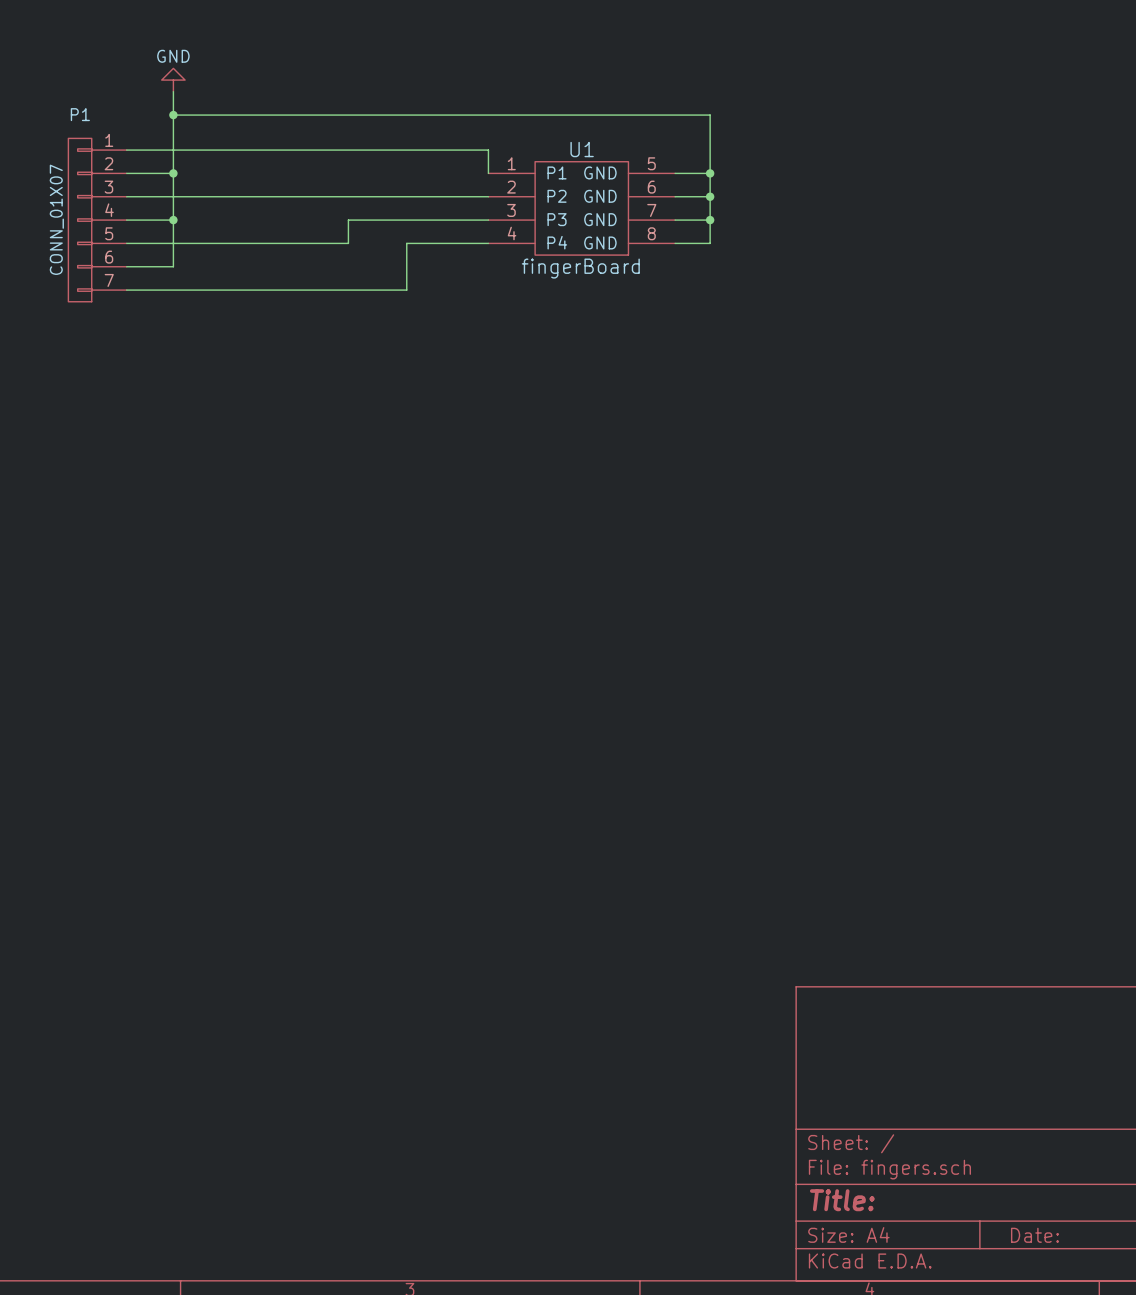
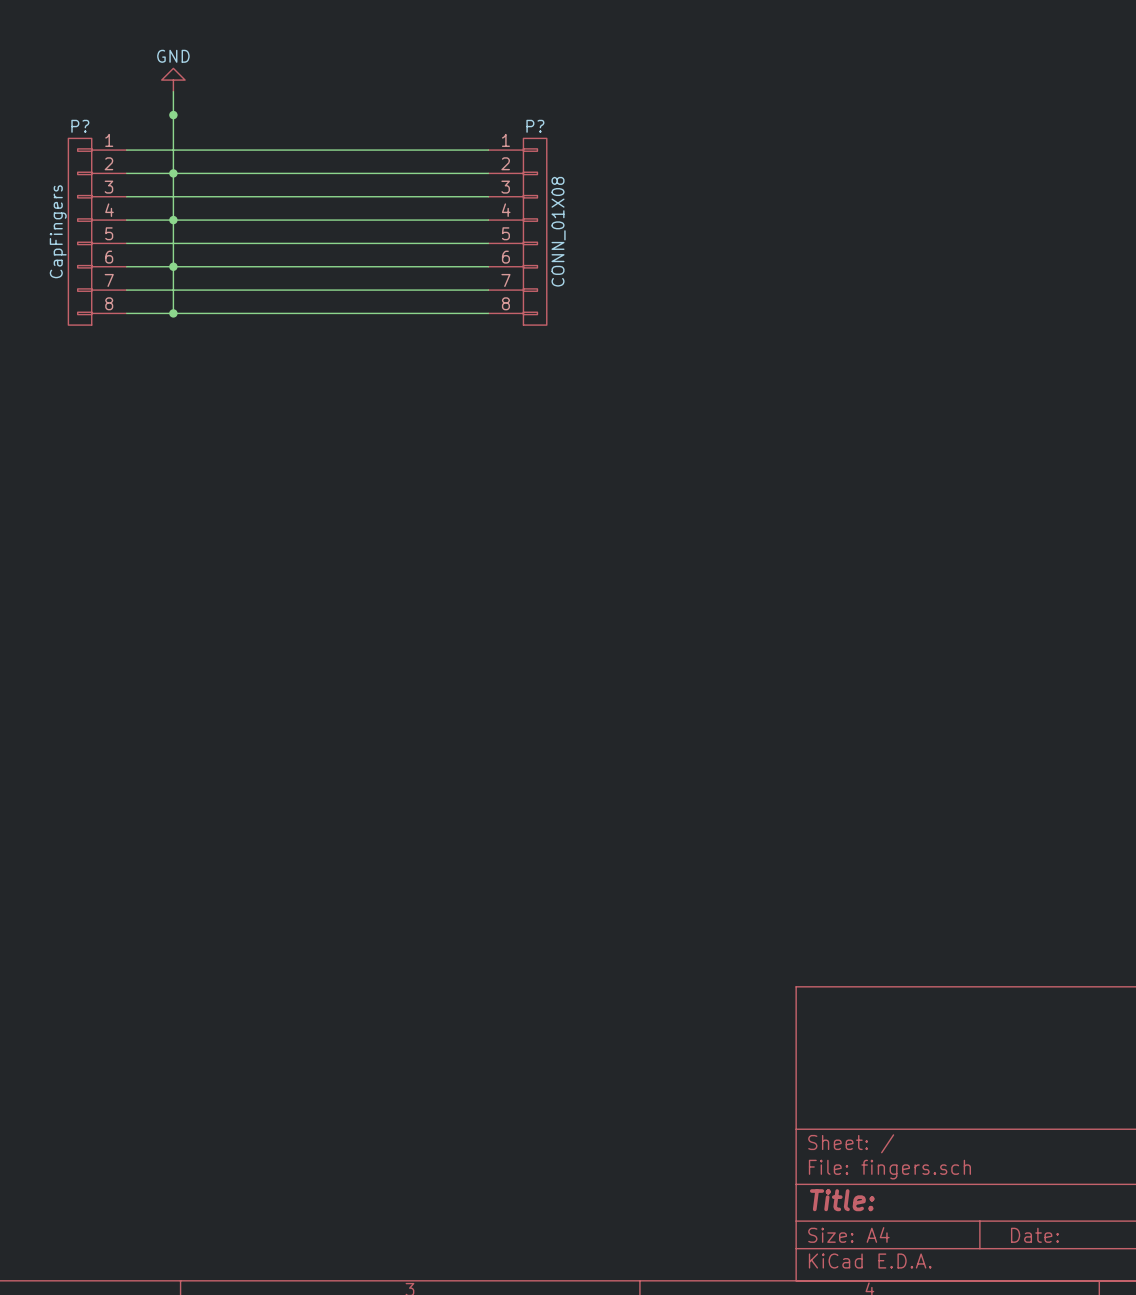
wire: (173, 115) (710, 115) (710, 243) (675, 243) -> none
wire: (488, 150) (488, 173) -> (173, 173) (488, 173)
wire: (675, 173) (710, 173) -> none
junction: (710, 173) -> none
wire: (675, 196) (710, 196) -> none
junction: (710, 196) -> none
U1: fingerBoard (581, 208) -> none
P1: CONN_01X07 (97, 220) -> none
wire: none -> (173, 220) (348, 220)
wire: (348, 220) (348, 243) -> (406, 243) (348, 243)
wire: (675, 220) (710, 220) -> none
junction: (710, 220) -> none
P?: none -> CapFingers (97, 231)
P?: none -> CONN_01X08 (517, 231)
wire: (406, 243) (406, 290) -> (488, 290) (406, 290)
junction: none -> (173, 266)
wire: none -> (488, 266) (173, 266) (173, 313)
wire: none -> (126, 313) (488, 313)
junction: none -> (173, 313)

